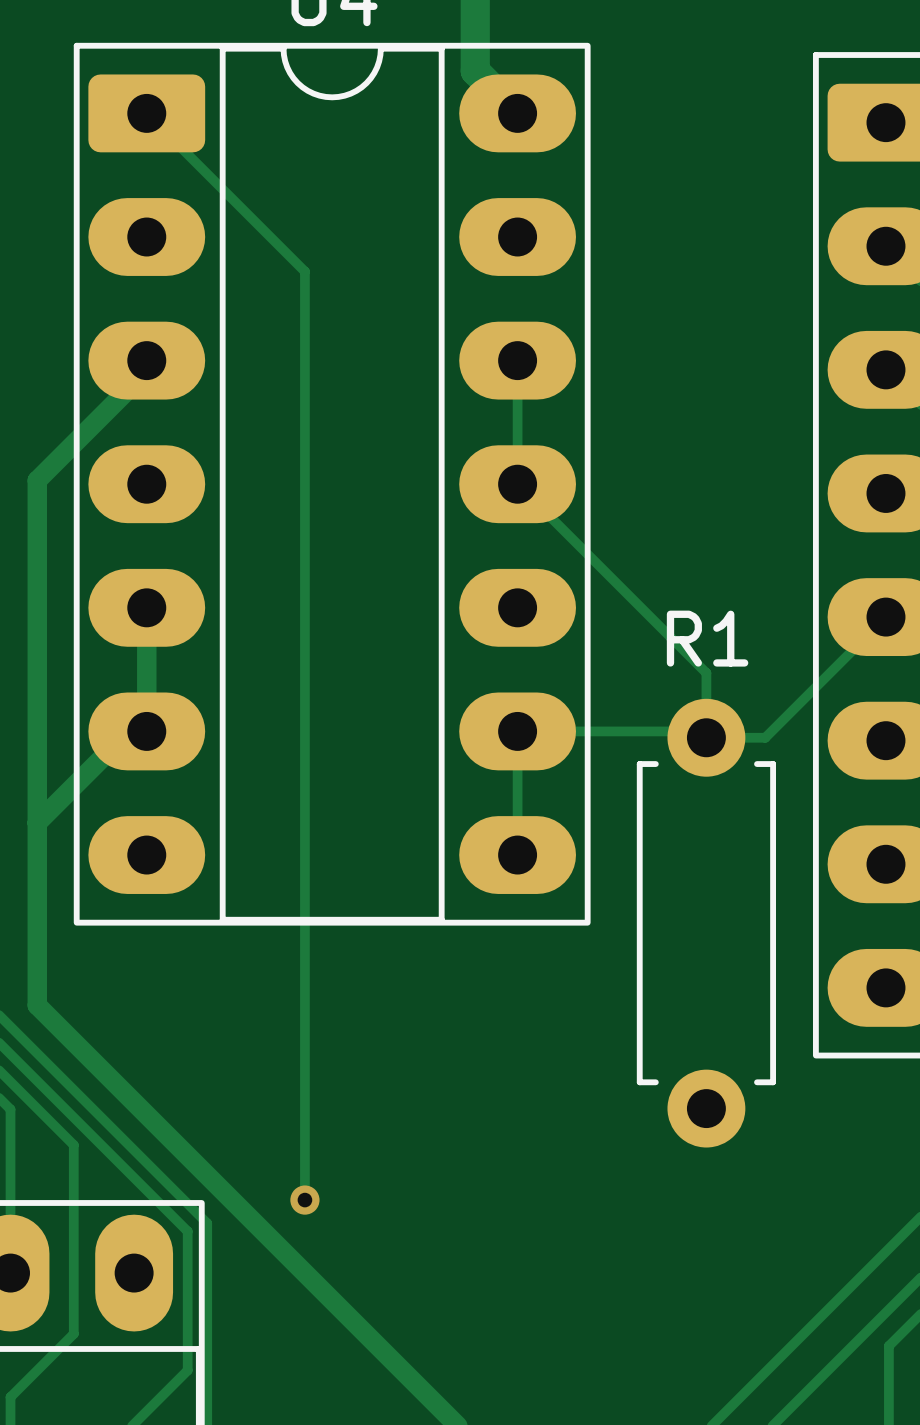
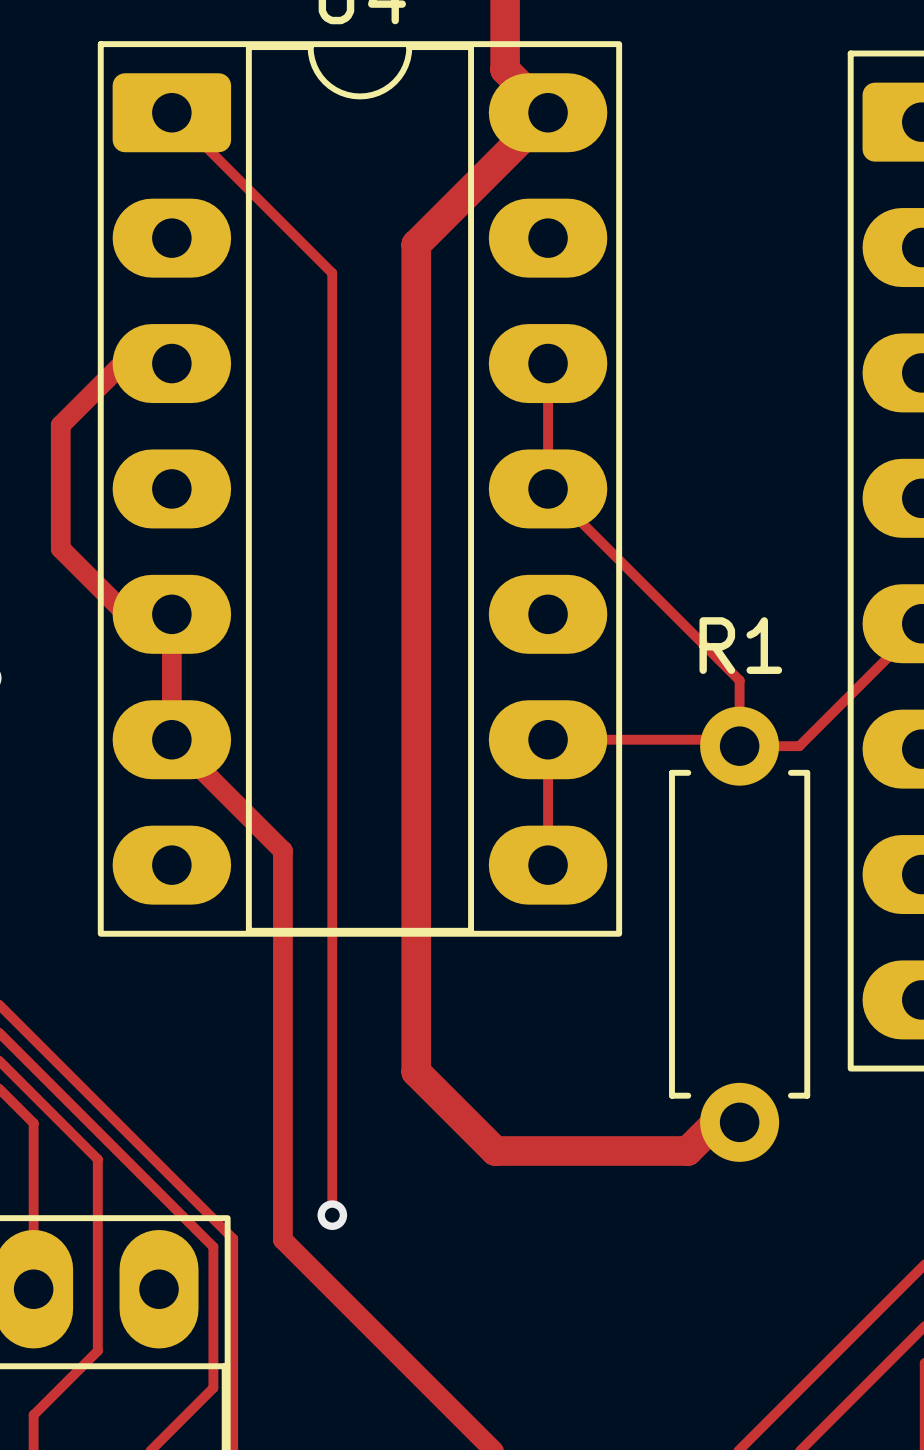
track: none -> (548, 112) (416, 244) (416, 1072) (495, 1150) (687, 1150) (716, 1122) (739, 1122)
track: (151, 366) (37, 480) -> (171, 363) (122, 363) (60, 425) (60, 485)
track: (37, 543) (37, 1005) (256, 1224) -> (171, 739) (282, 850) (282, 1239)
track: none -> (60, 548) (126, 614) (171, 614)
track: (128, 731) (37, 822) -> none

